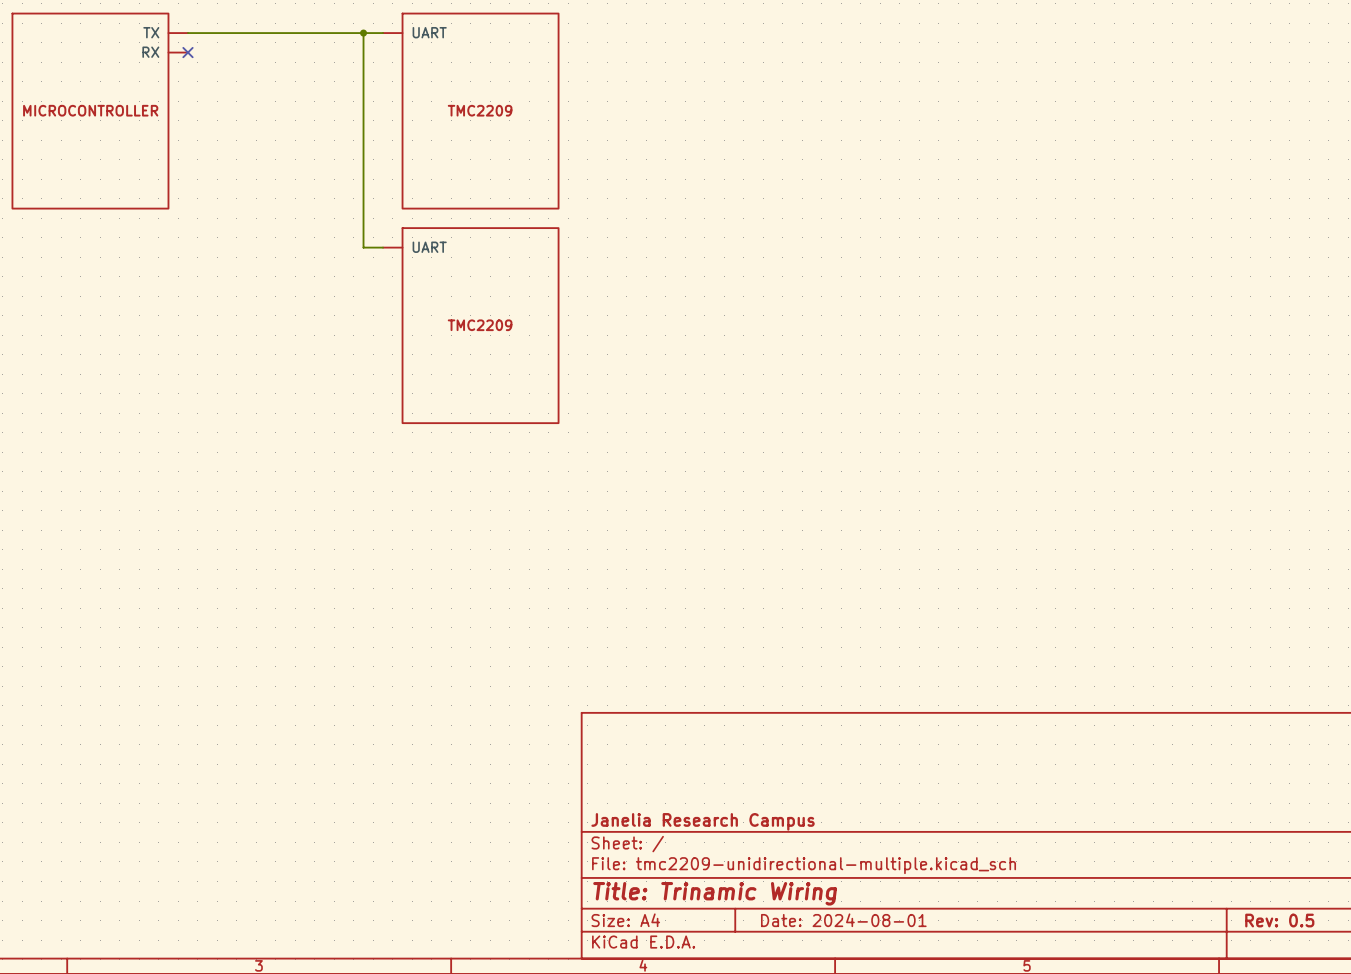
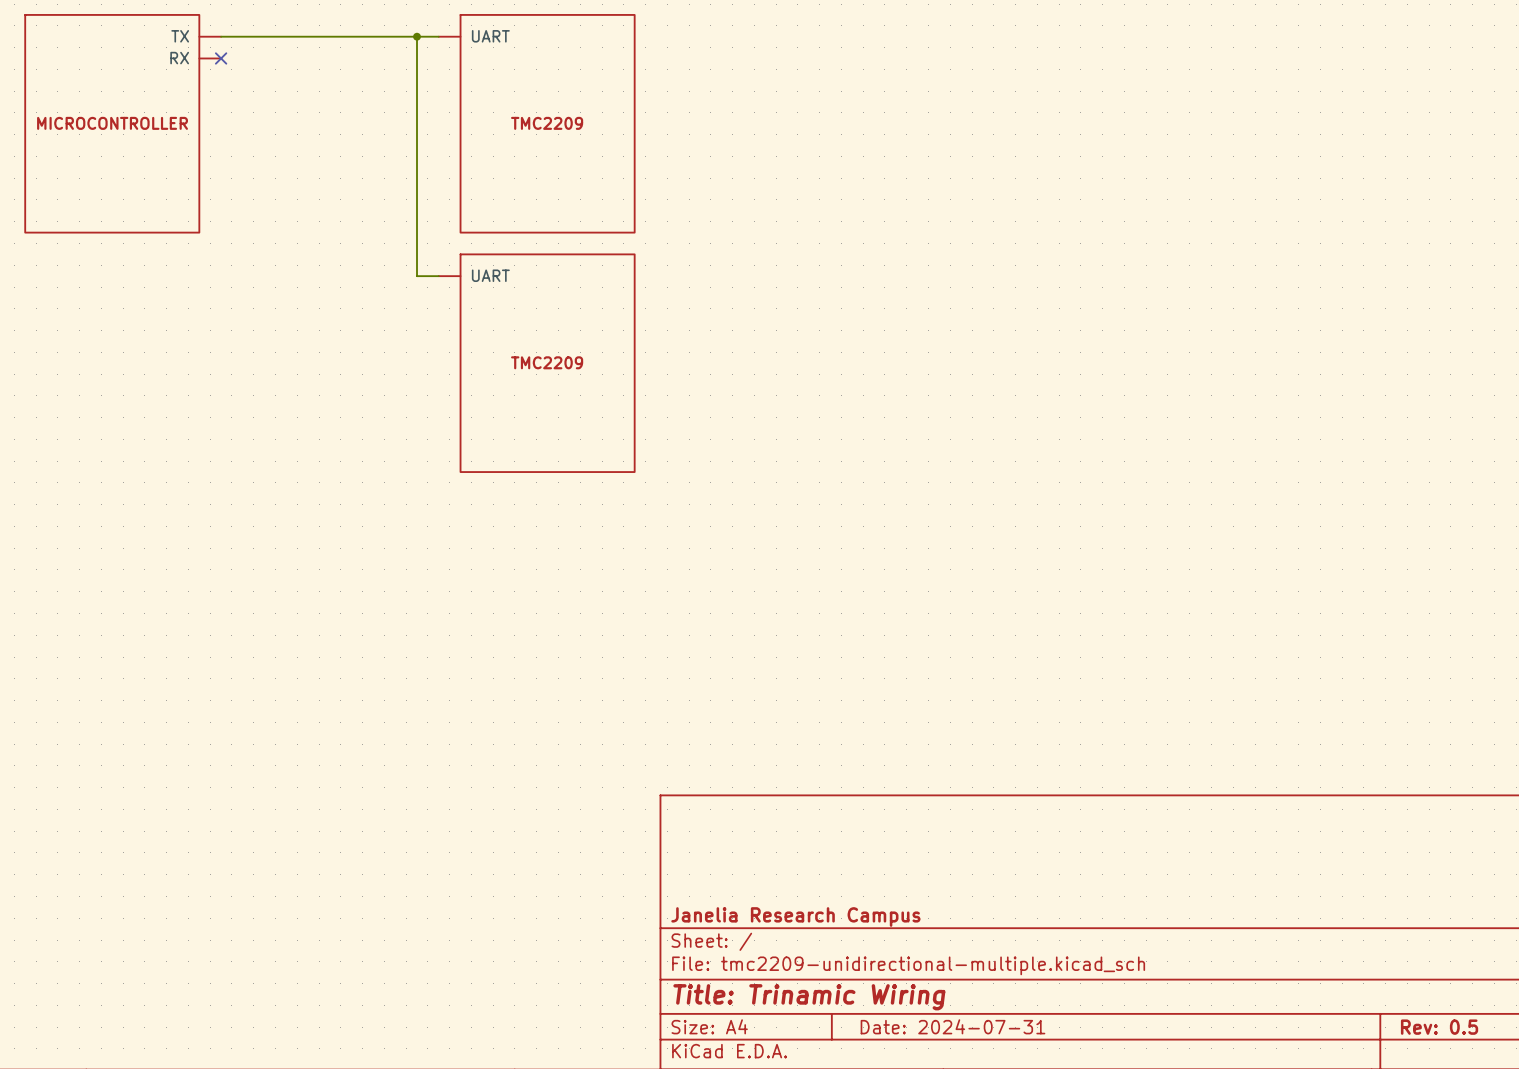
title block: Date: 2024-08-01 (843, 920) -> Date: 2024-07-31 (952, 1026)

